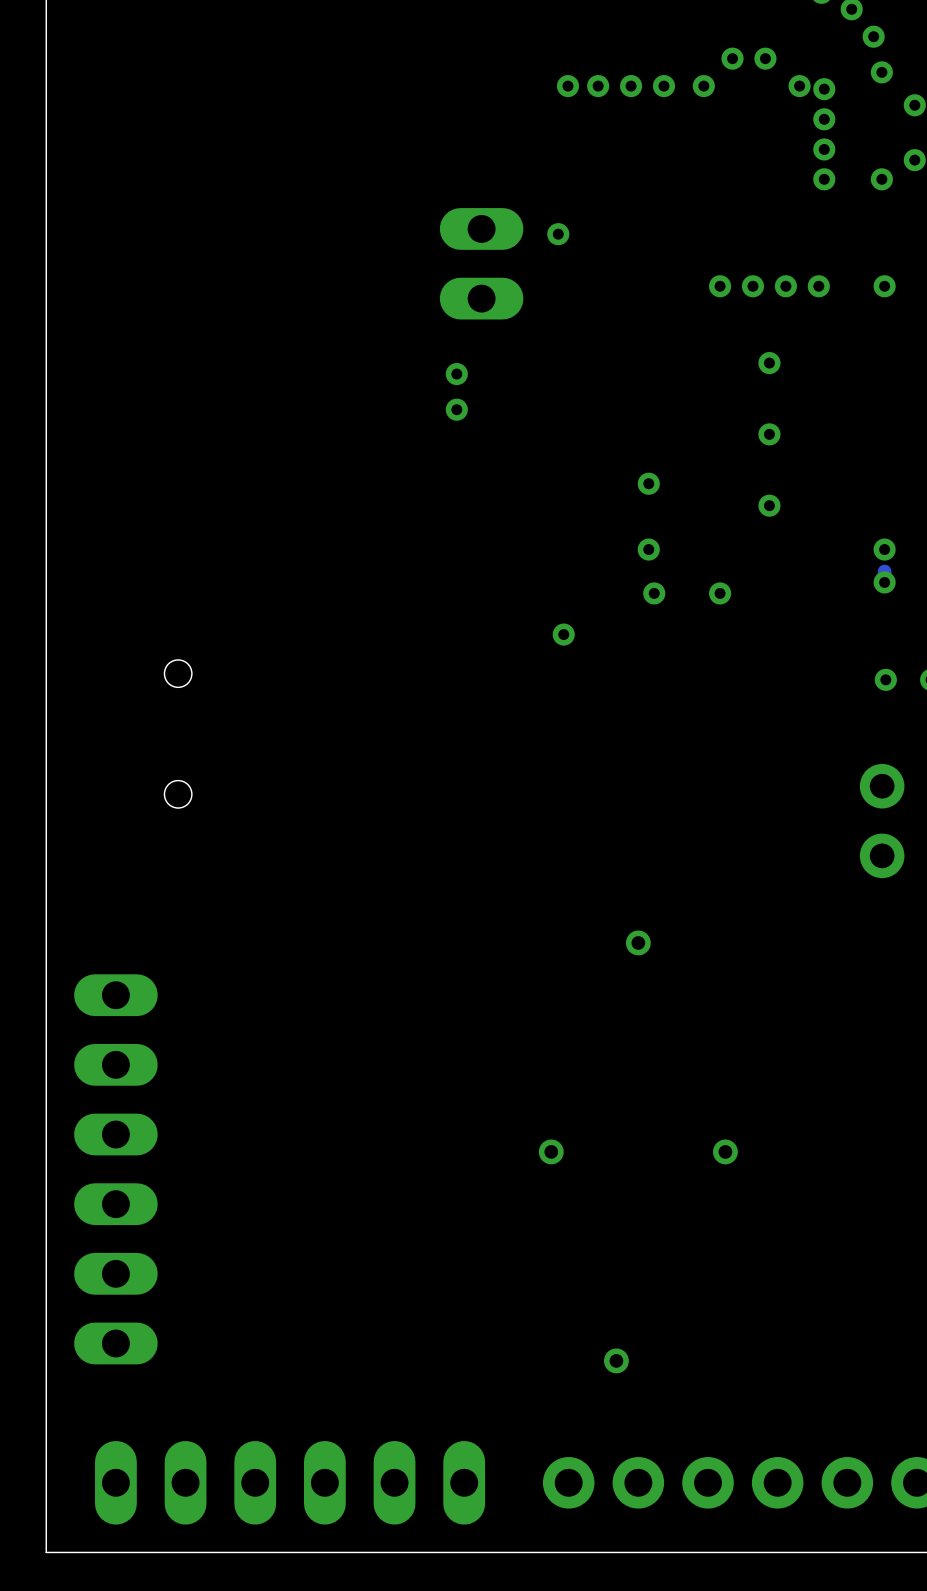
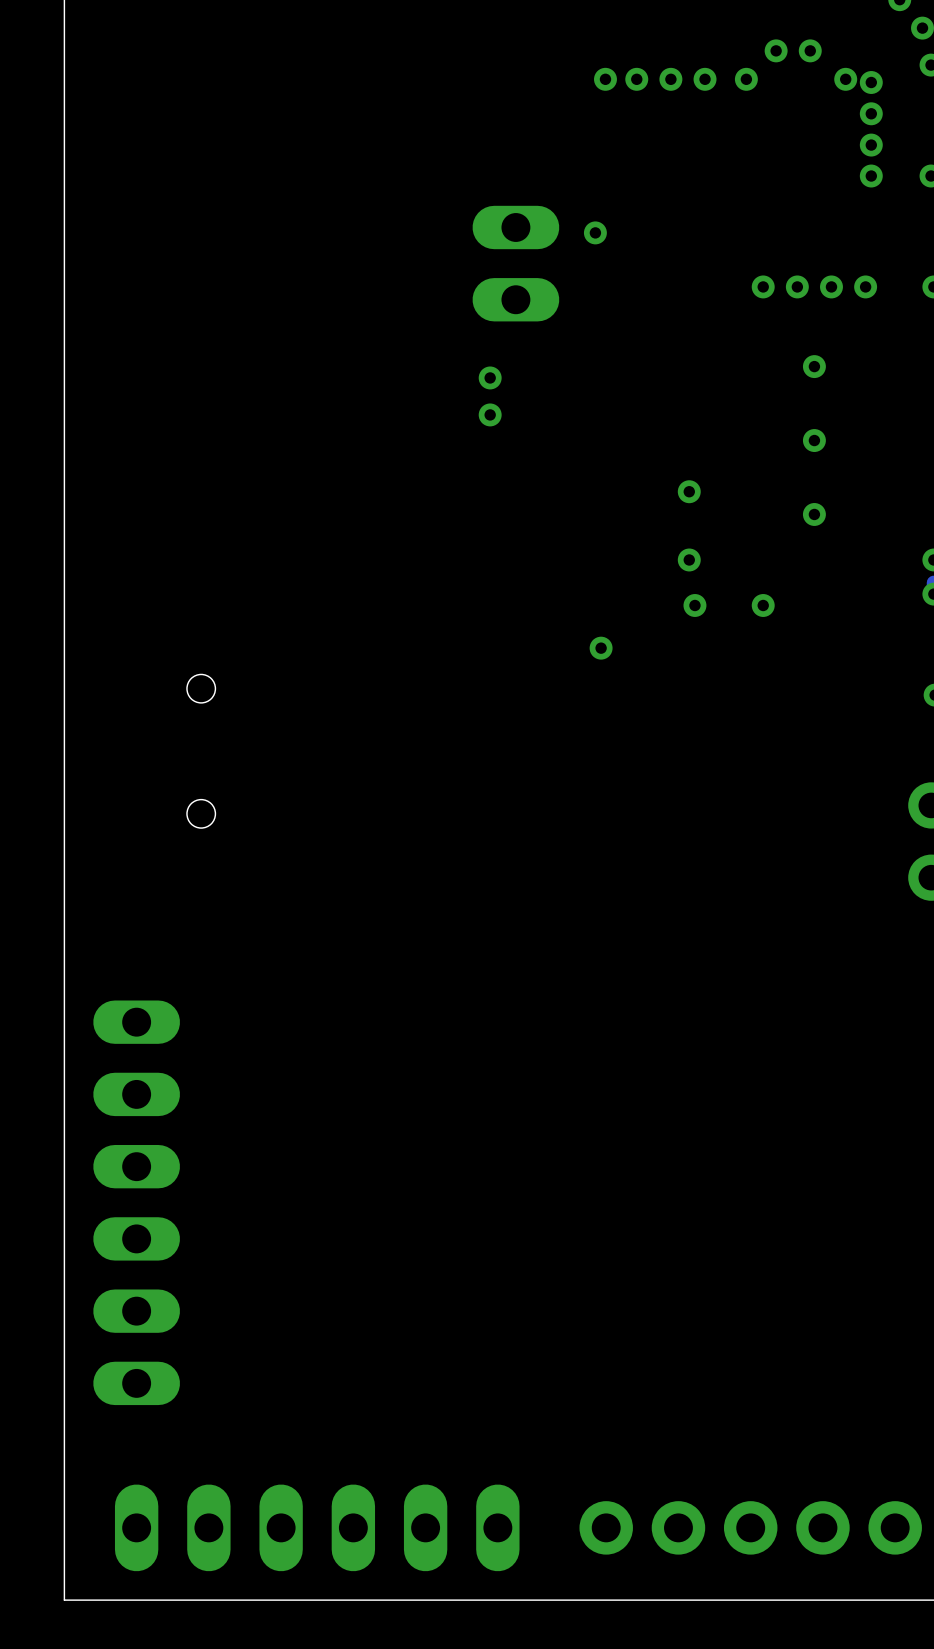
via: (638, 942) -> none
via: (551, 1151) -> none
via: (725, 1151) -> none
via: (616, 1360) -> none

